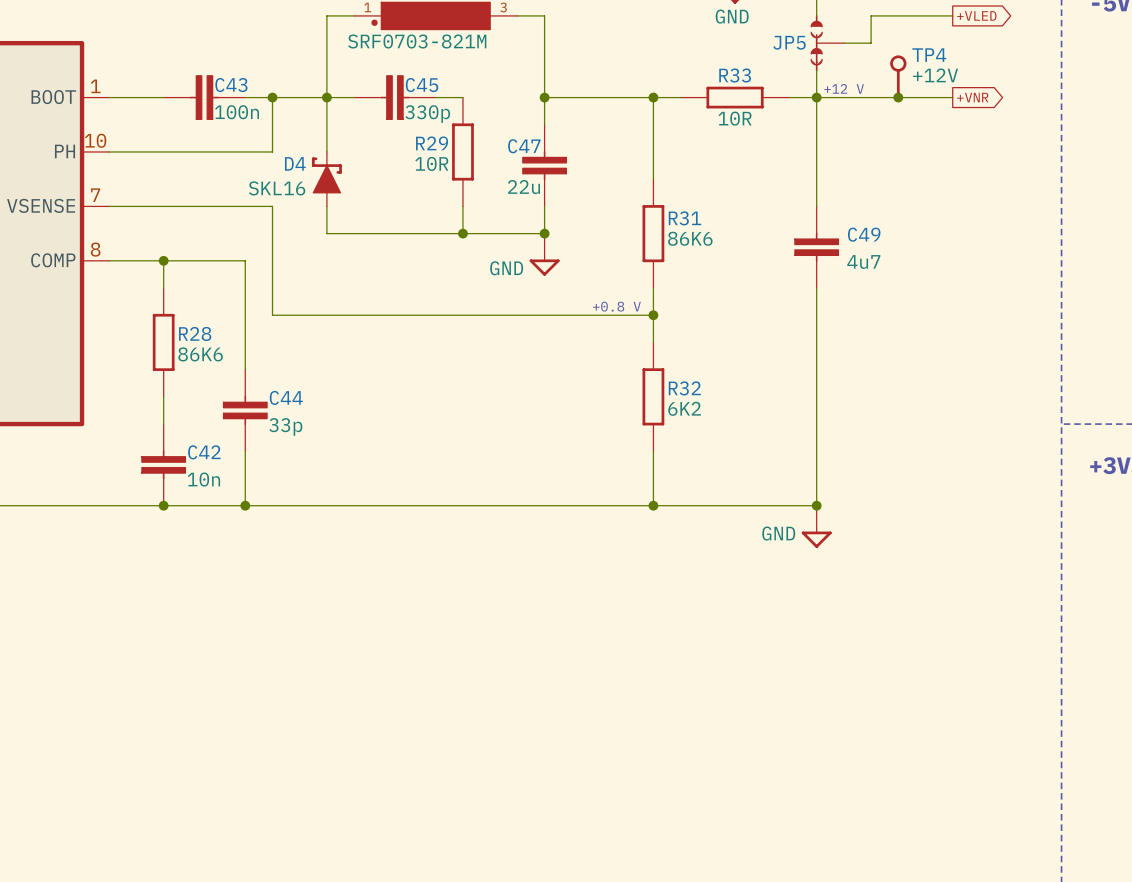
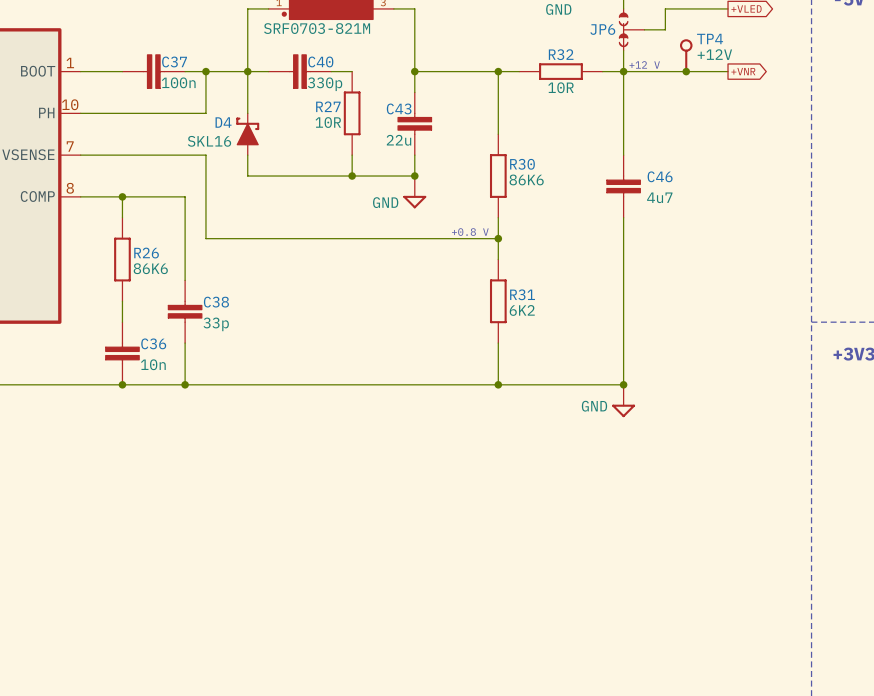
JP5 name: JP5 (789, 42) -> JP6 (602, 29)
R33 name: R33 (735, 75) -> R32 (561, 54)
C43 name: C43 (231, 85) -> C37 (174, 61)
C45 name: C45 (422, 85) -> C40 (320, 61)
R29 name: R29 (432, 143) -> R27 (328, 106)
C47 name: C47 (524, 146) -> C43 (399, 108)
R31 name: R31 (684, 218) -> R30 (522, 164)
C49 name: C49 (864, 234) -> C46 (660, 176)
R28 name: R28 (195, 333) -> R26 (146, 253)
R32 name: R32 (684, 388) -> R31 (522, 294)
C44 name: C44 (286, 397) -> C38 (216, 302)
C42 name: C42 (204, 452) -> C36 (153, 343)

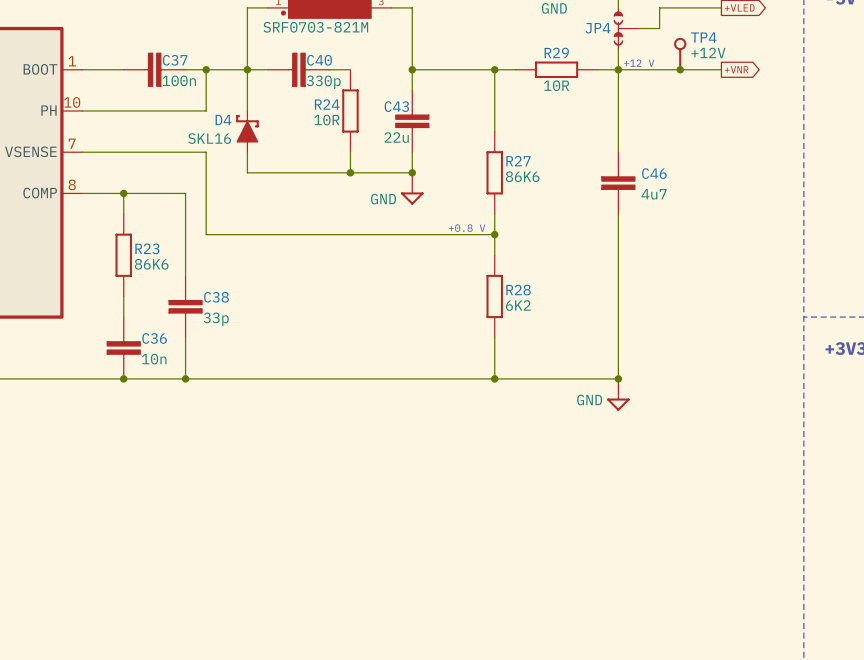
JP6 name: JP6 (602, 29) -> JP4 (598, 28)
R32 name: R32 (561, 54) -> R29 (556, 52)
R27 name: R27 (328, 106) -> R24 (327, 104)
R30 name: R30 (522, 164) -> R27 (518, 161)
R26 name: R26 (146, 253) -> R23 (147, 248)
R31 name: R31 (522, 294) -> R28 (518, 290)

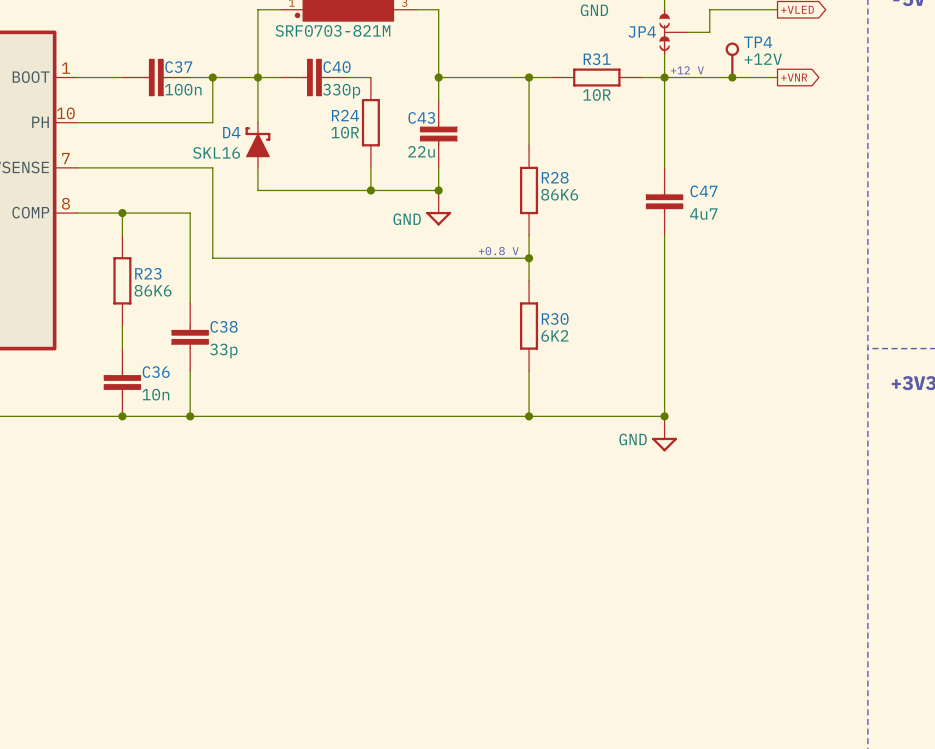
R29 name: R29 (556, 52) -> R31 (597, 59)
R27 name: R27 (518, 161) -> R28 (555, 177)
C46 name: C46 (654, 173) -> C47 (704, 191)
R28 name: R28 (518, 290) -> R30 (555, 318)

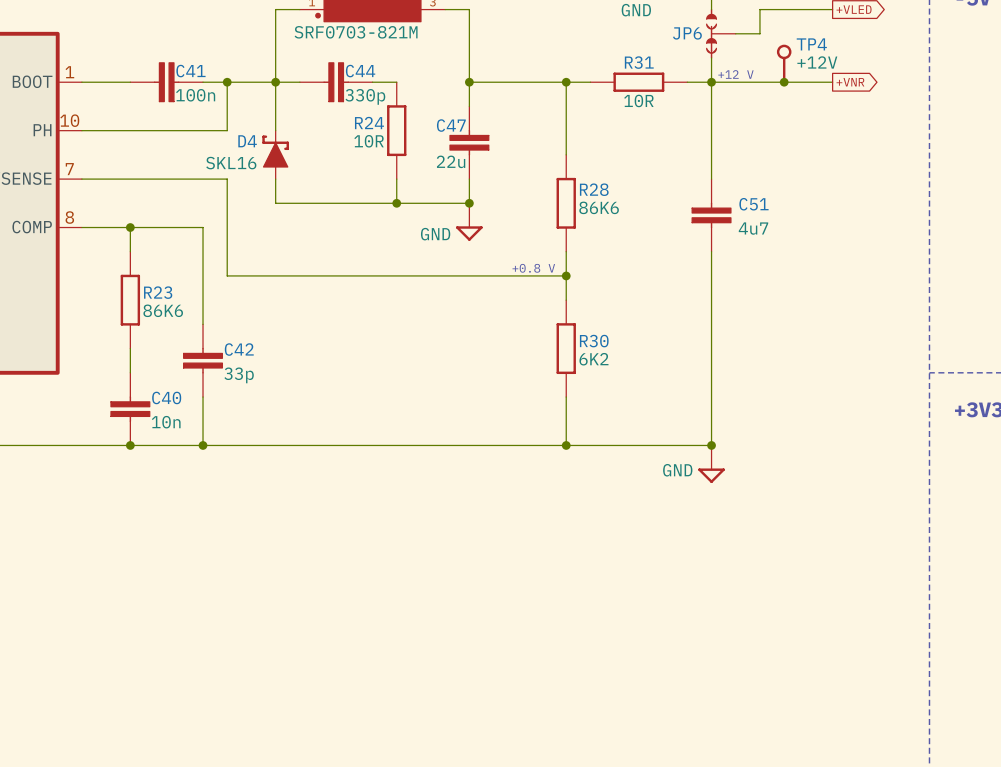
JP4 name: JP4 (642, 32) -> JP6 (687, 33)
C37 name: C37 (178, 67) -> C41 (190, 71)
C40 name: C40 (337, 67) -> C44 (360, 71)
C43 name: C43 (421, 117) -> C47 (451, 125)
C47 name: C47 (704, 191) -> C51 (753, 204)
C38 name: C38 (224, 326) -> C42 (239, 349)
C36 name: C36 (156, 372) -> C40 (166, 397)

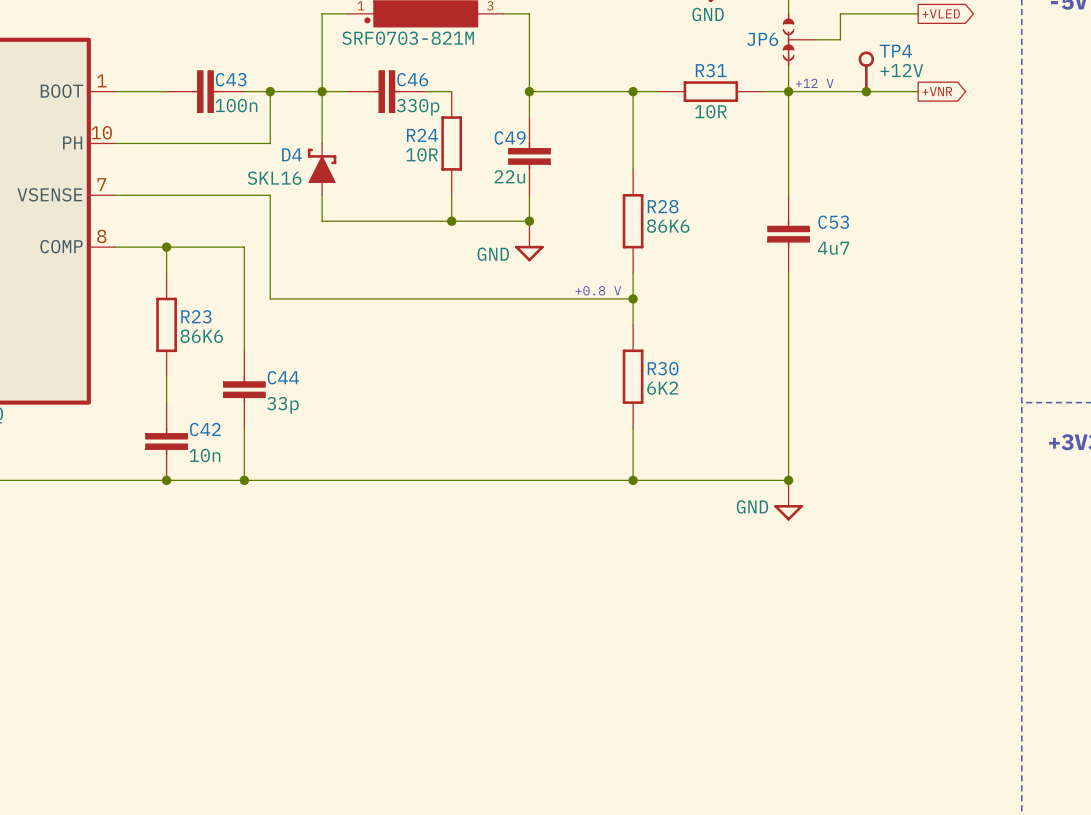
C41 name: C41 (190, 71) -> C43 (231, 79)
C44 name: C44 (360, 71) -> C46 (412, 79)
C47 name: C47 (451, 125) -> C49 (510, 137)
C51 name: C51 (753, 204) -> C53 (833, 222)
C42 name: C42 (239, 349) -> C44 (283, 377)
C40 name: C40 (166, 397) -> C42 (205, 429)

